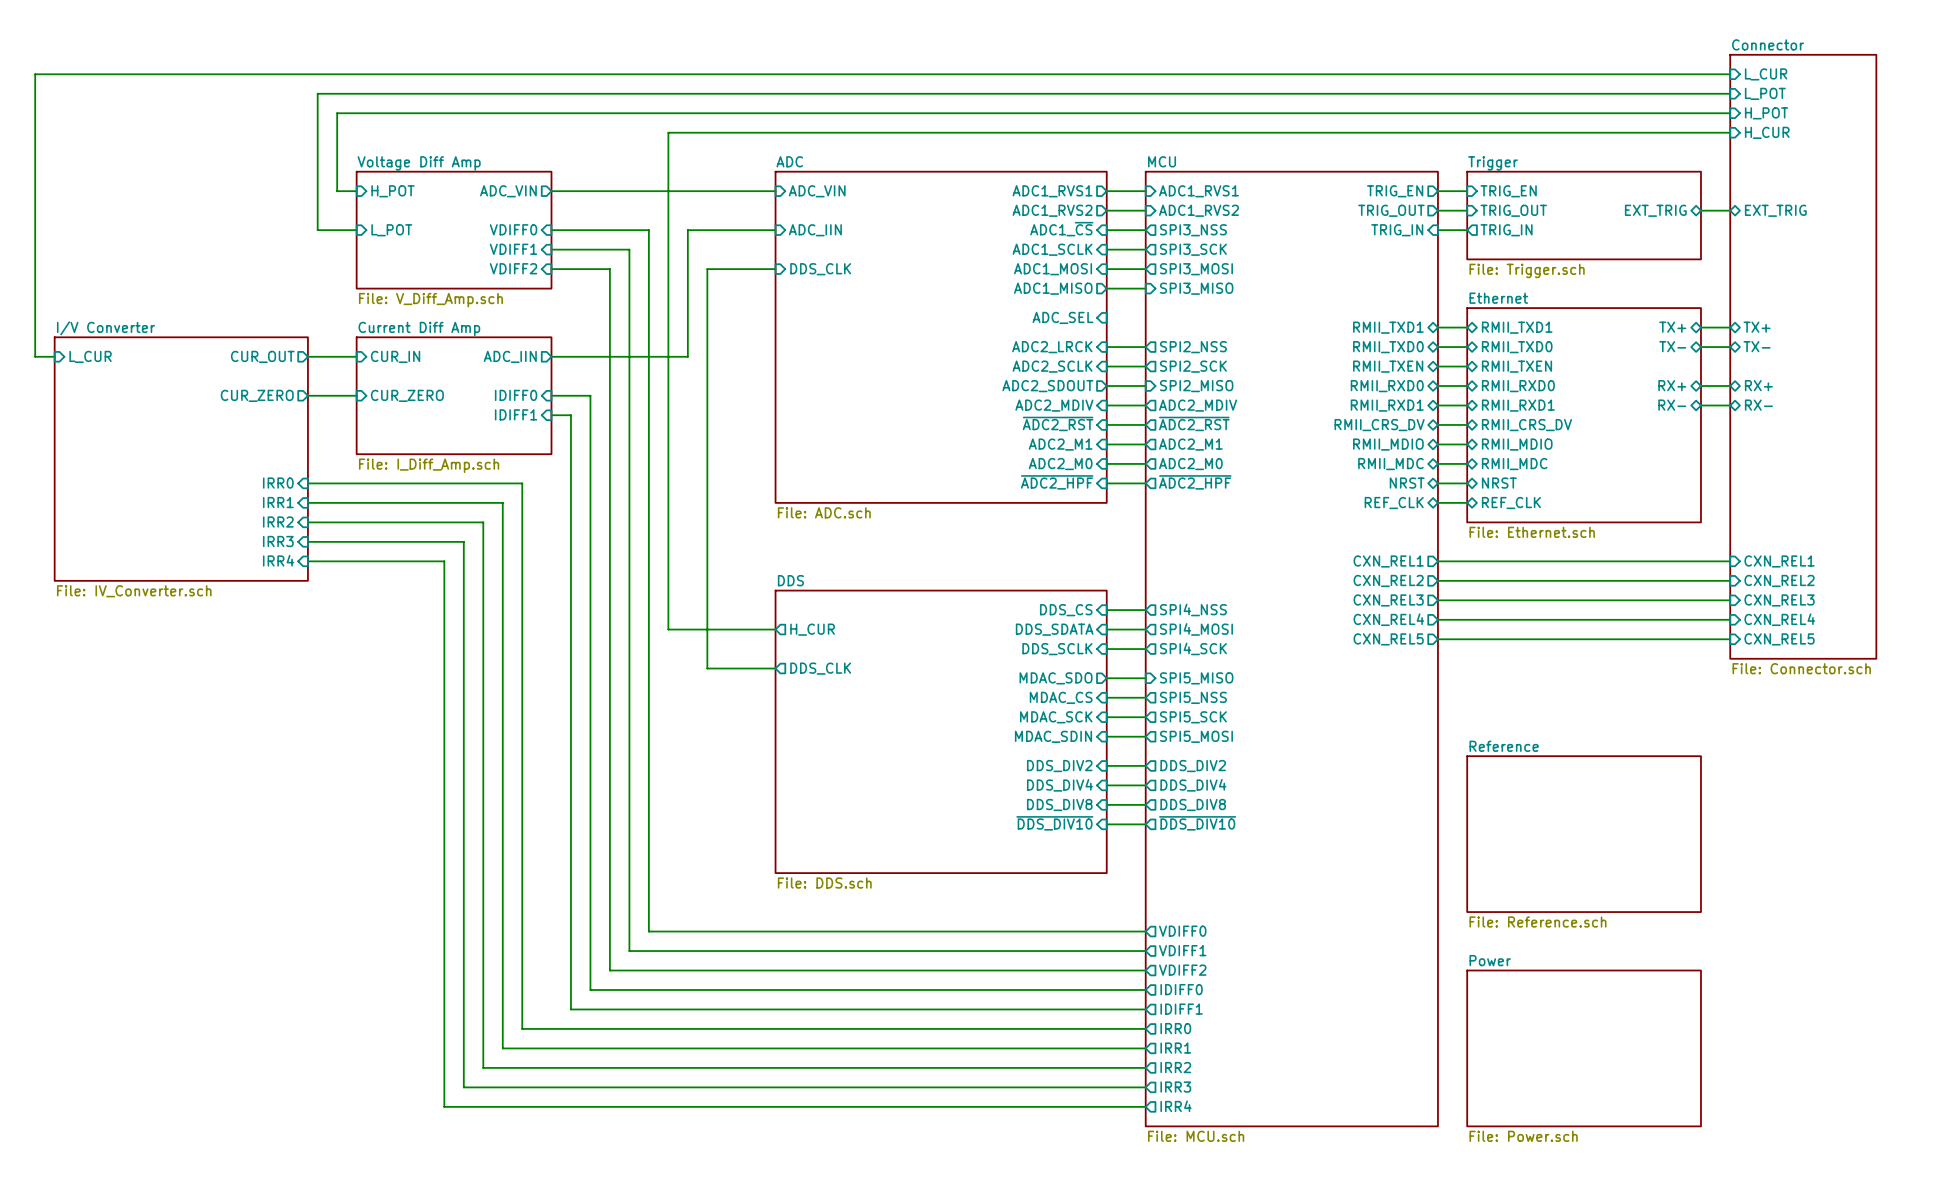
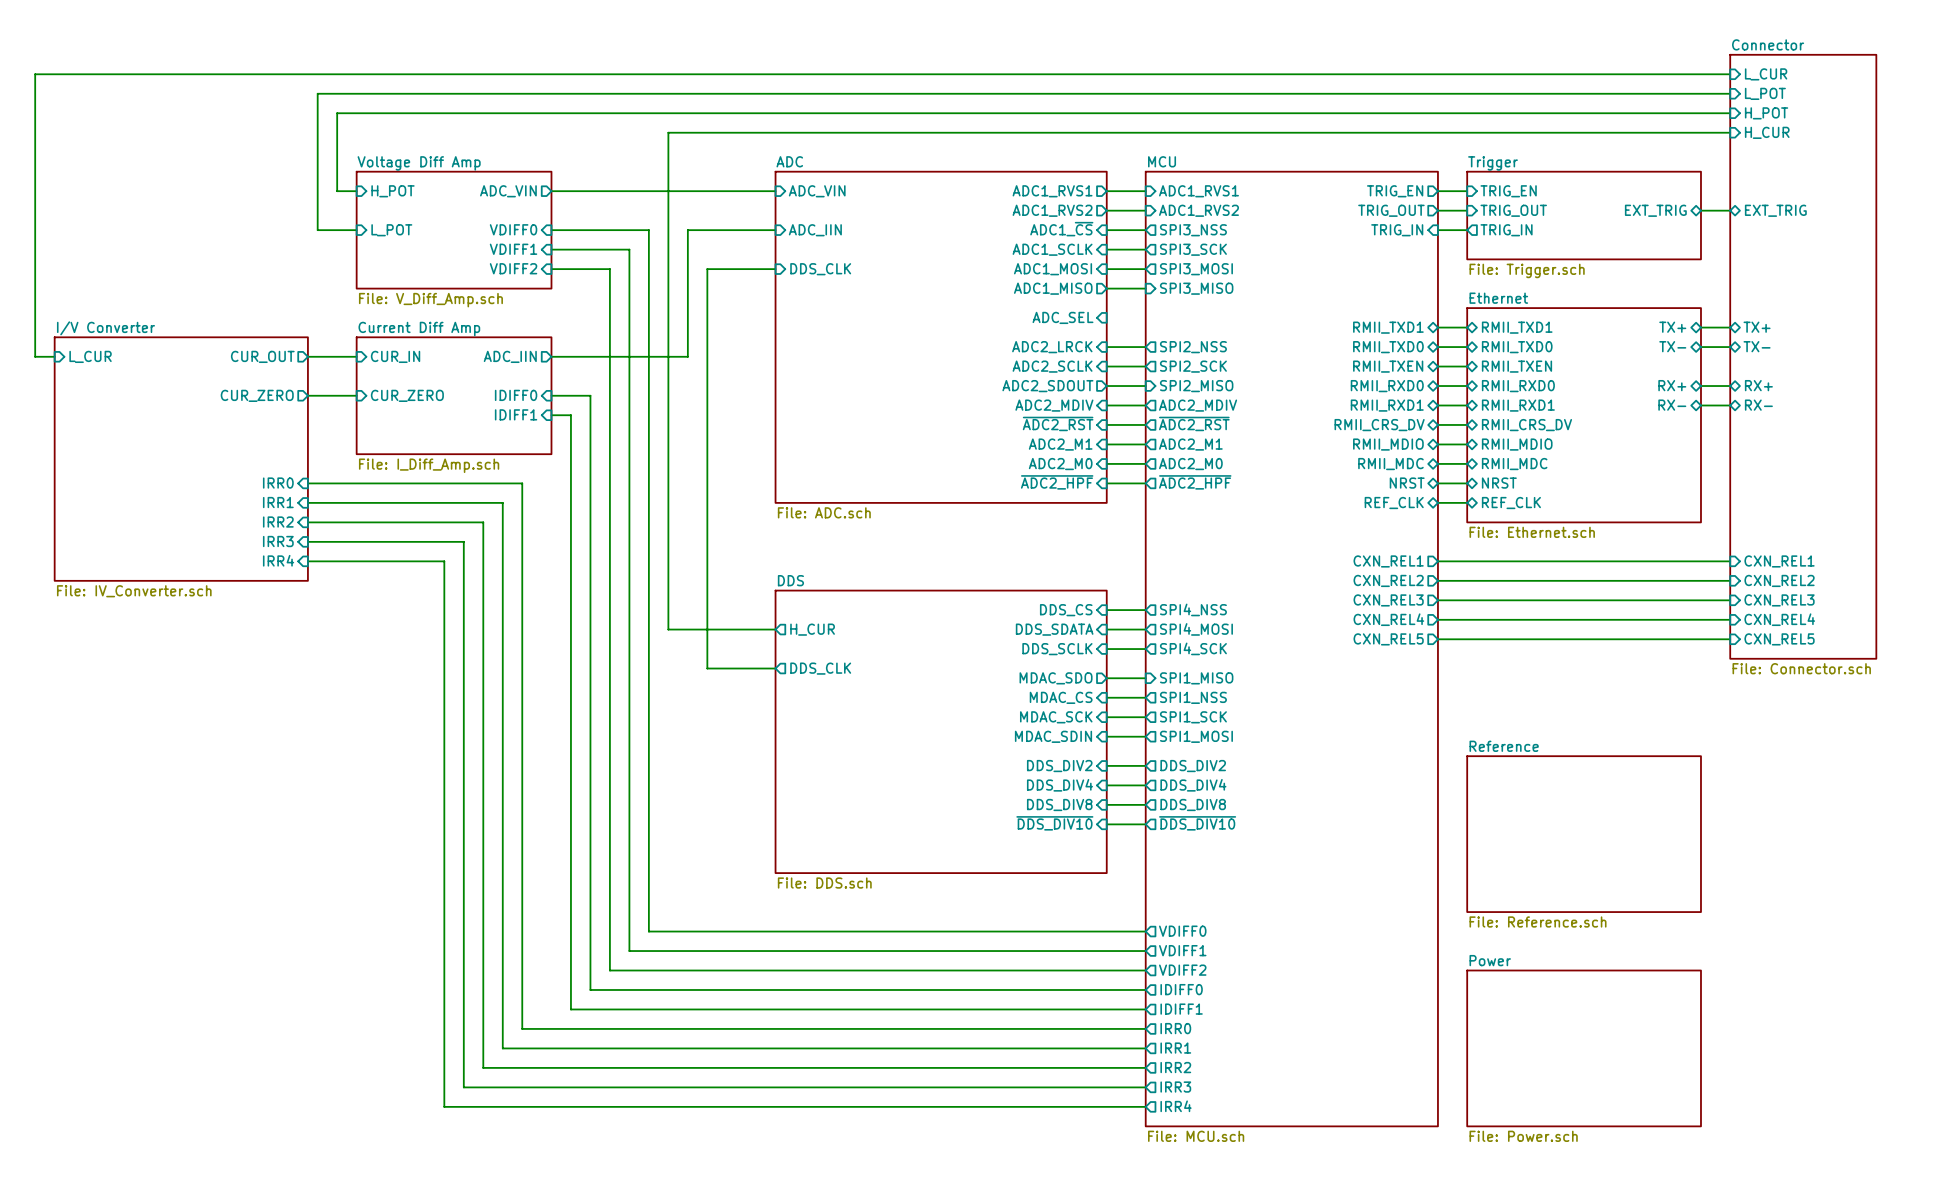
sheet pin: SPI5_MISO (1196, 678) -> SPI1_MISO (1196, 678)
sheet pin: SPI5_NSS (1193, 697) -> SPI1_NSS (1193, 697)
sheet pin: SPI5_SCK (1193, 717) -> SPI1_SCK (1193, 717)
sheet pin: SPI5_MOSI (1196, 736) -> SPI1_MOSI (1196, 736)

